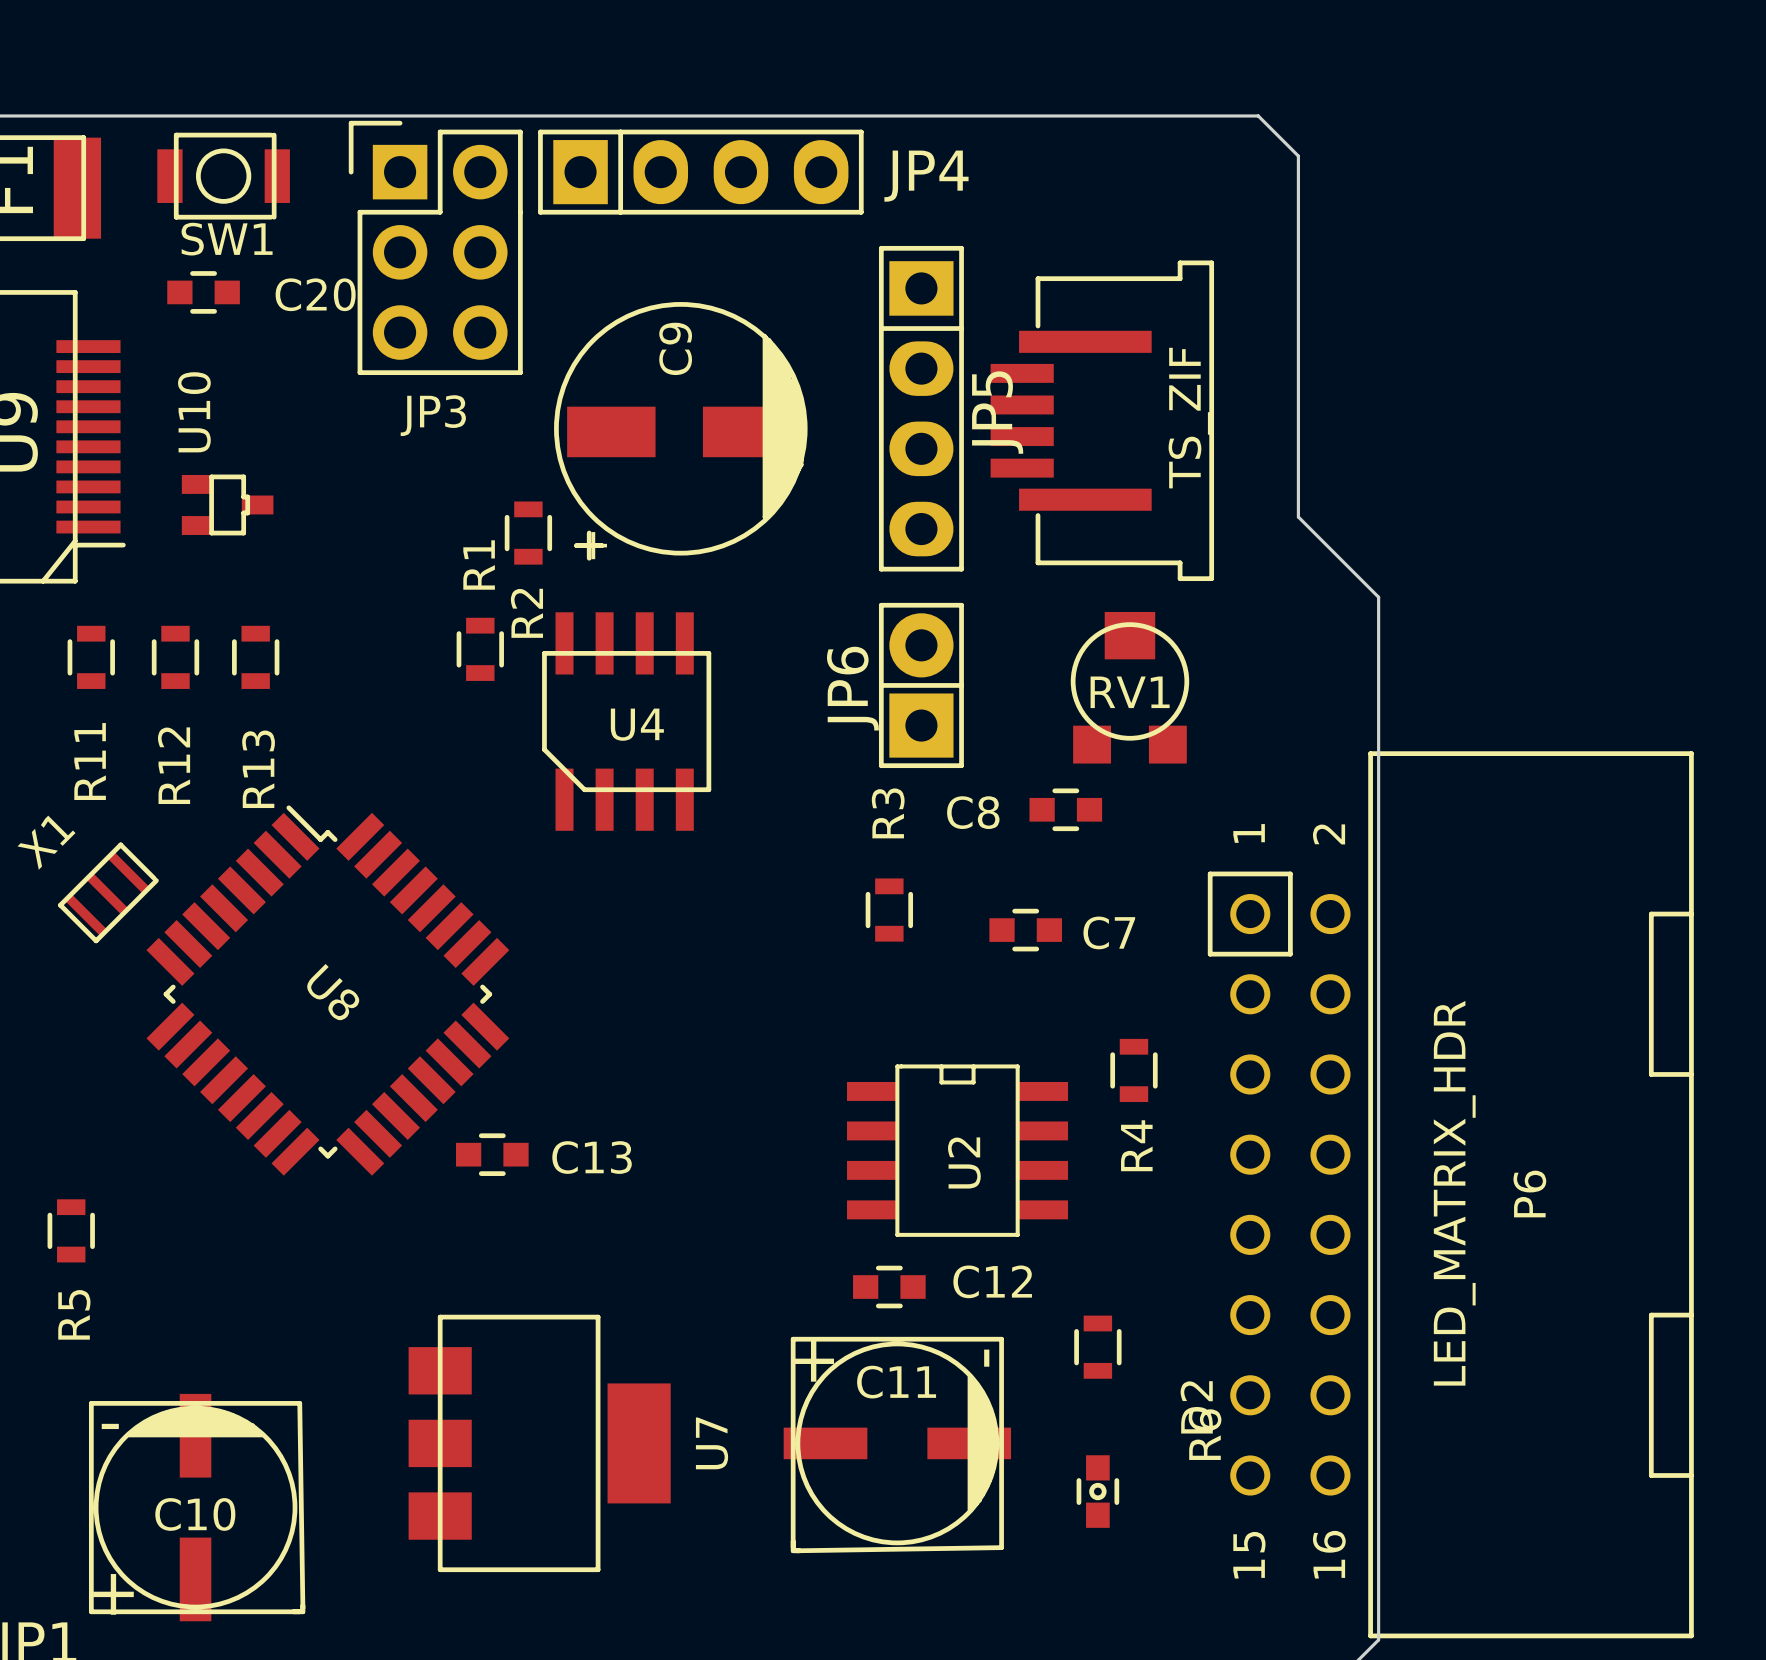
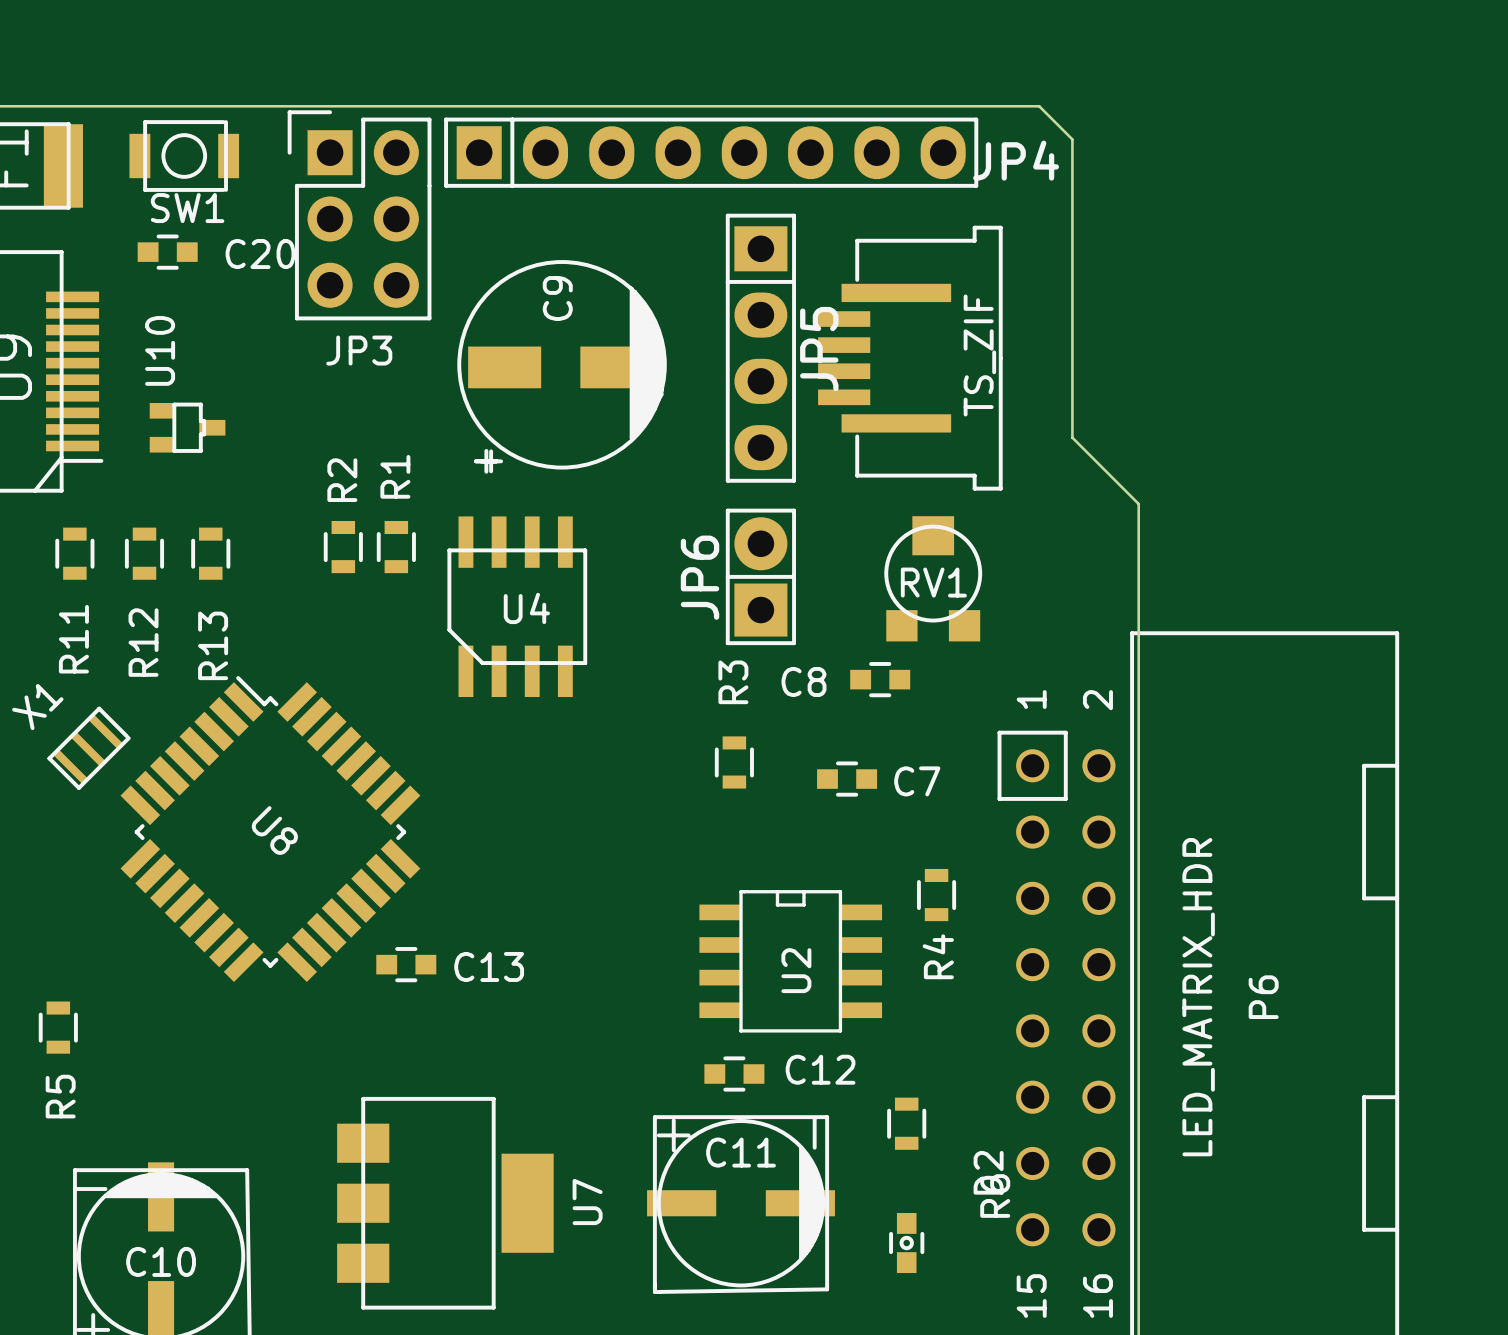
JP4 footprint: [538, 129, 864, 215] -> [444, 117, 979, 188]
JP4 name position: JP4 (926, 176) -> JP4 (1016, 160)
R2 position: (528, 533) -> (343, 547)
R2 name position: R2 (526, 613) -> R2 (342, 480)

